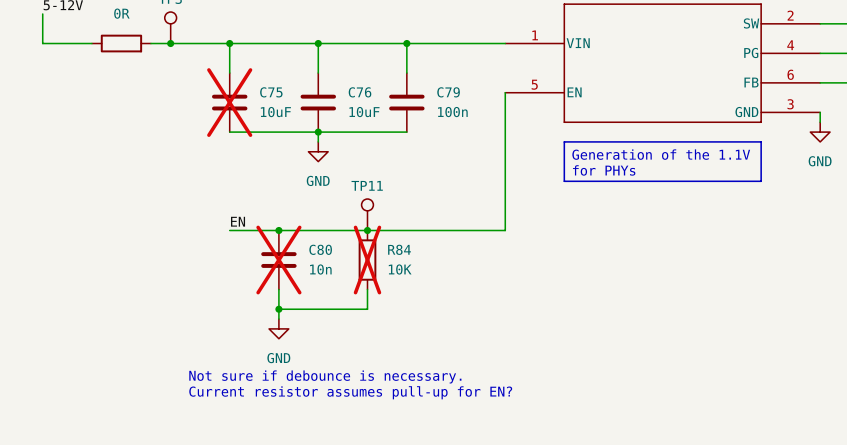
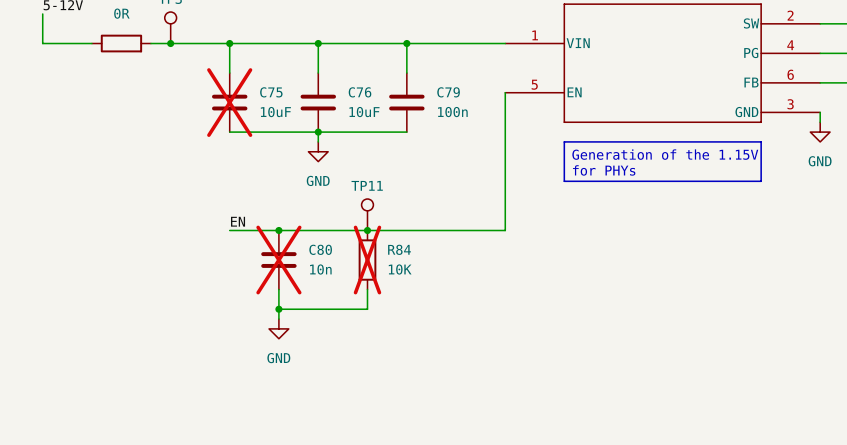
text: Generation of the 1.1V (661, 154) -> Generation of the 1.15V (665, 154)
text: Not sure if debounce is necessary. (325, 376) -> none
text: Current resistor assumes pull-up for EN? (350, 392) -> none

